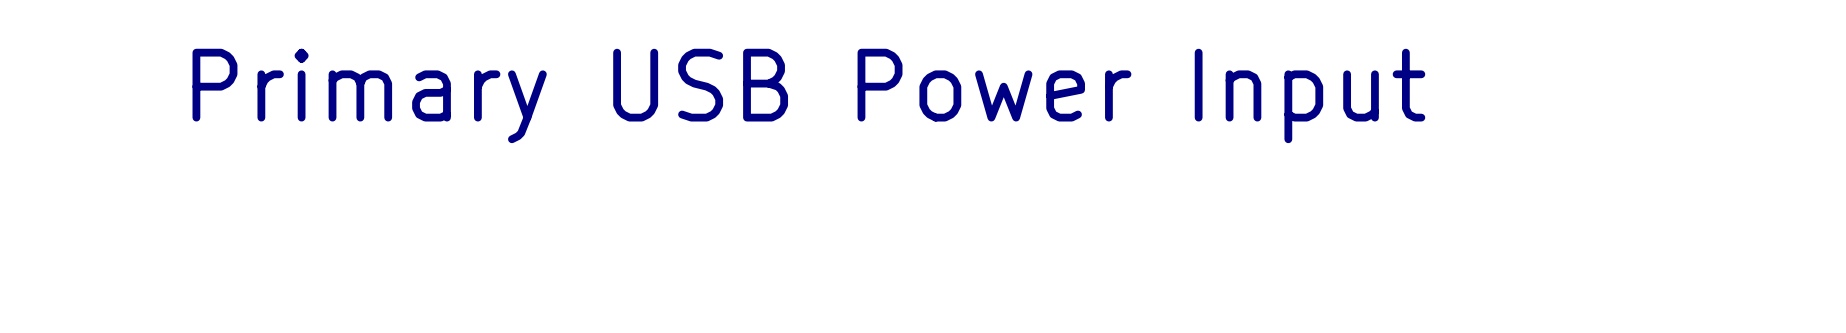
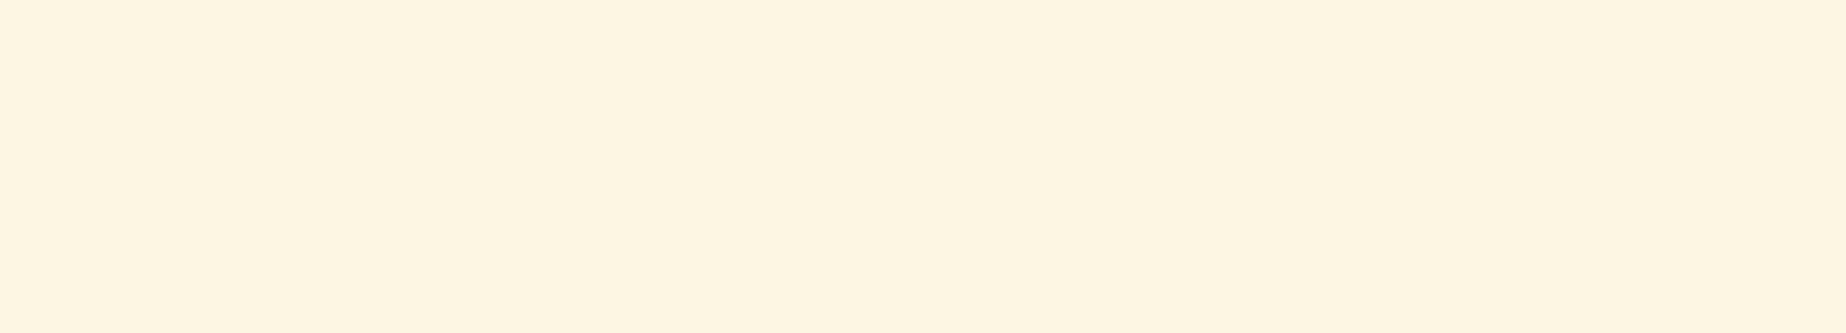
text: Primary USB Power Input (808, 95) -> none

